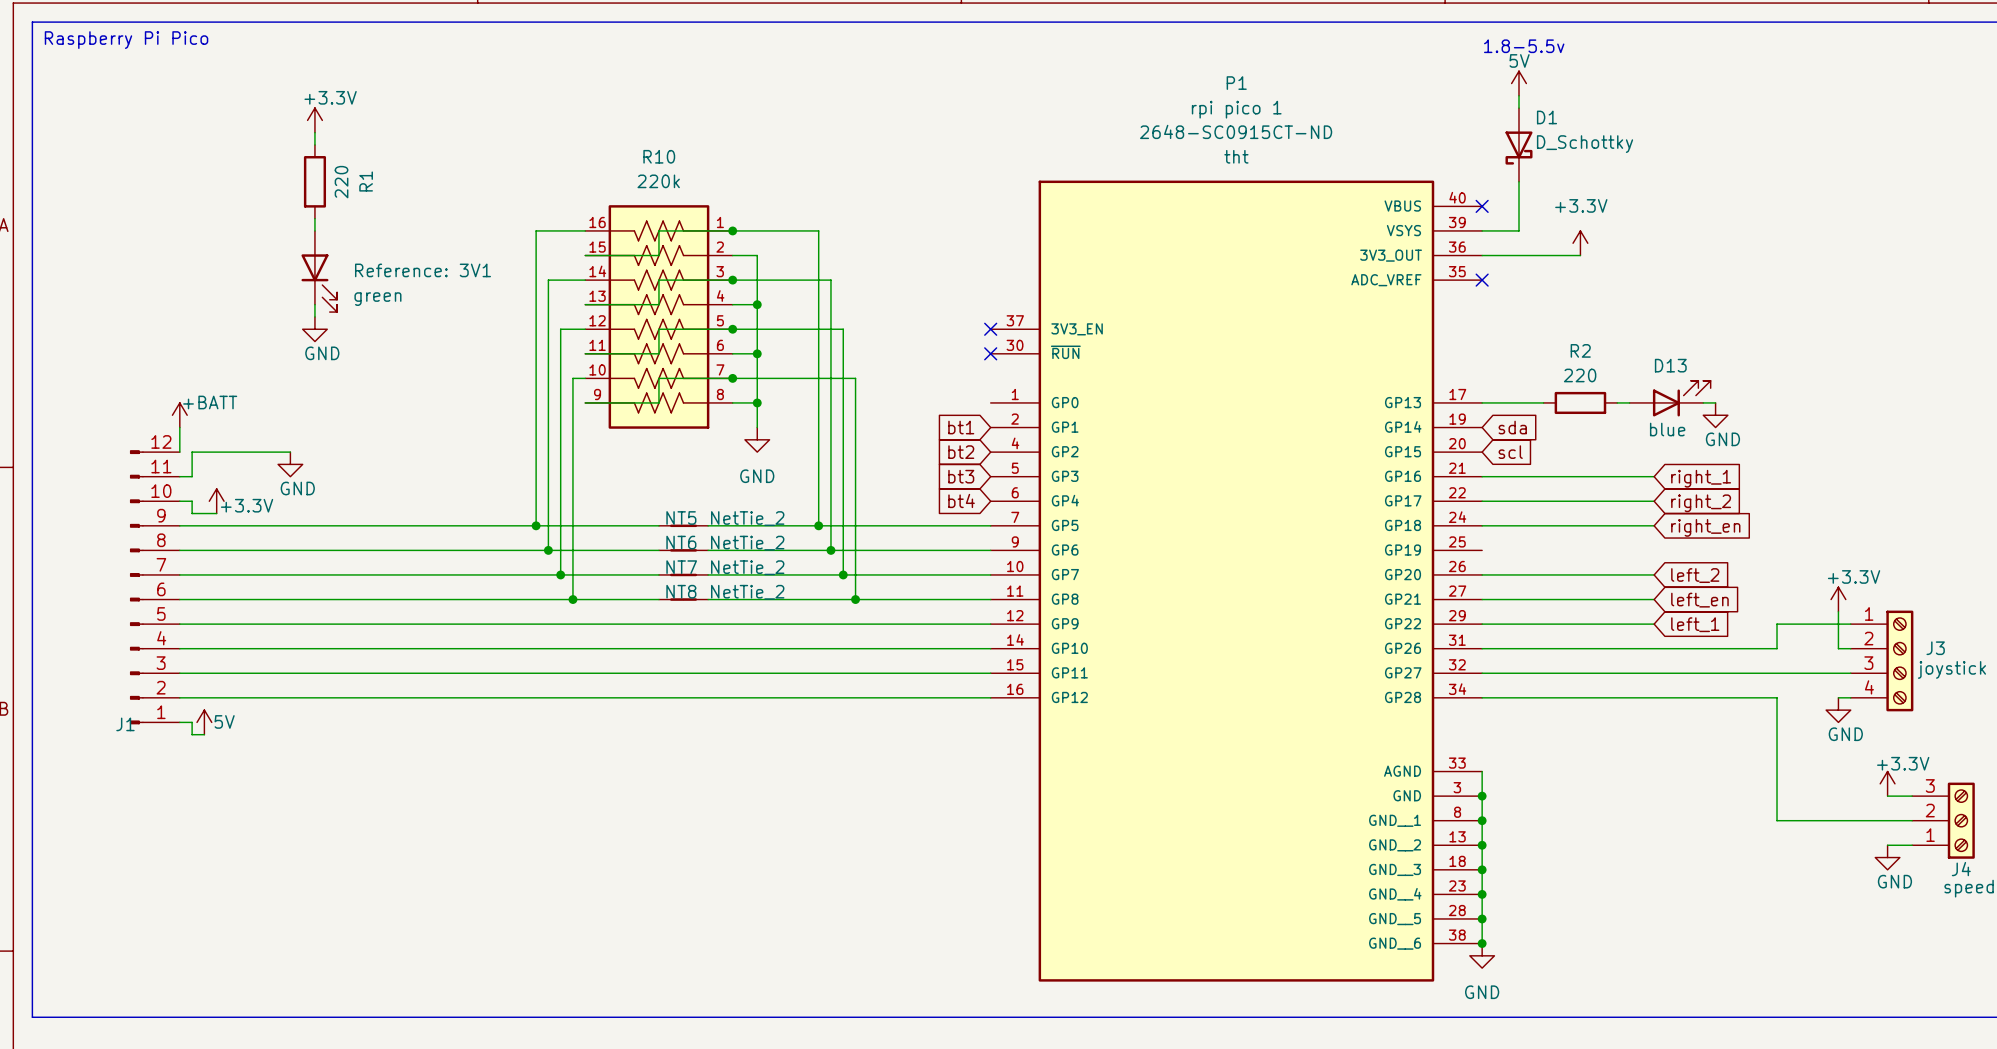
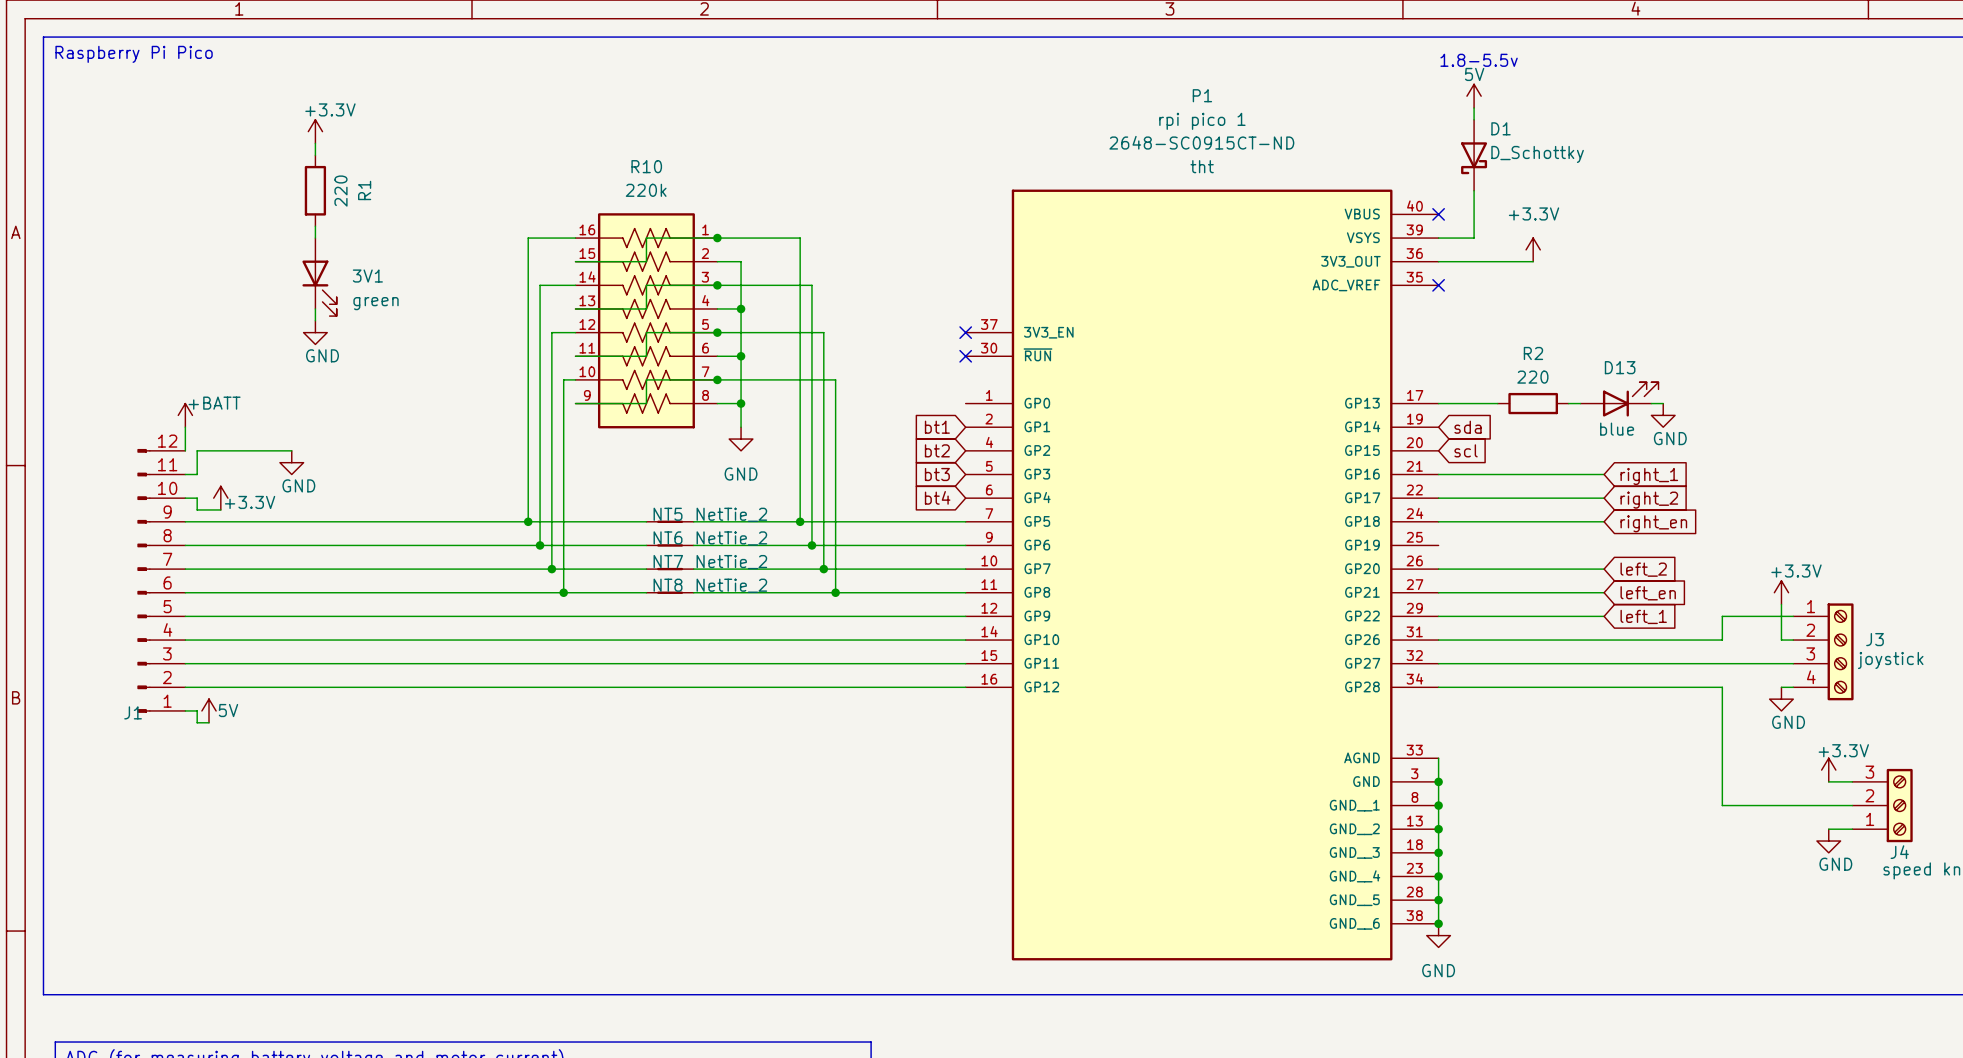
3V1 name: Reference: 3V1 (423, 270) -> 3V1 (367, 276)

